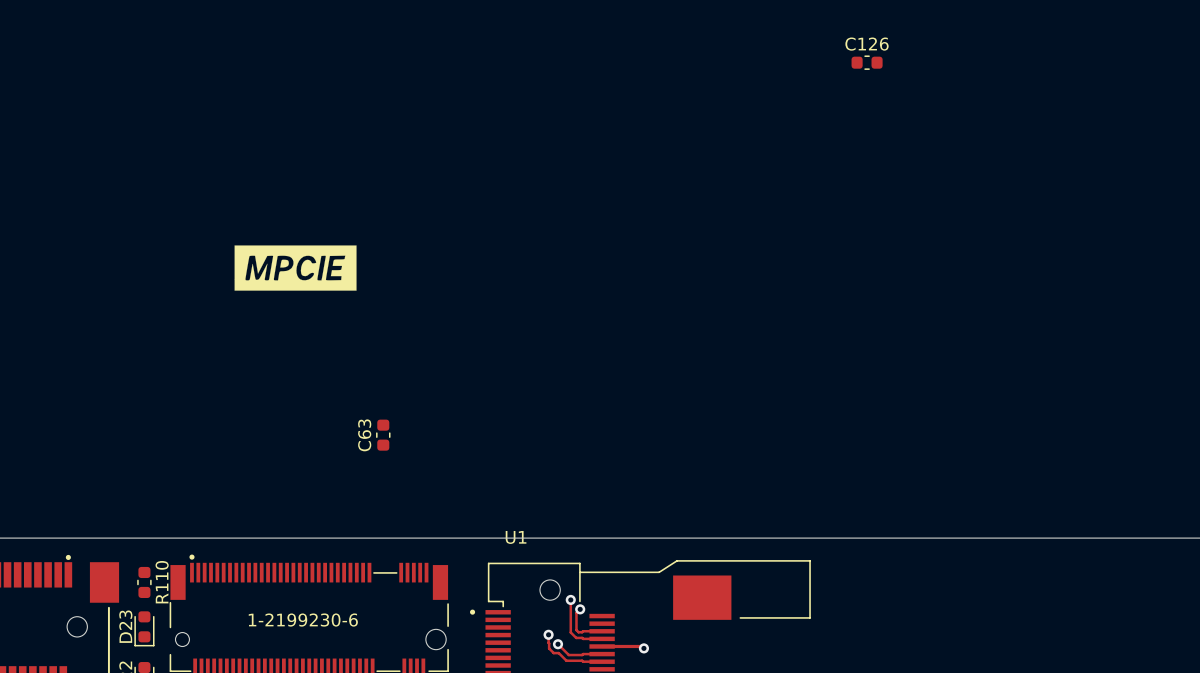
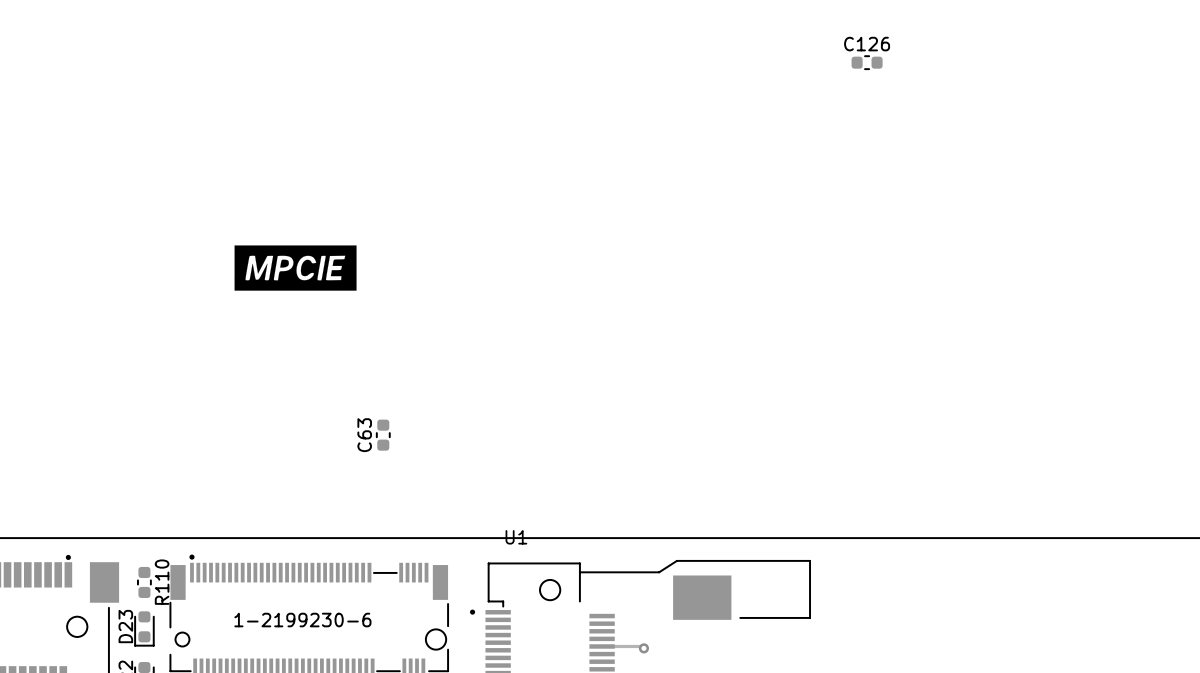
track: (570, 599) (570, 632) (576, 637) (602, 638) -> none
via: (570, 599) -> none
track: (580, 609) (576, 613) (576, 630) (578, 632) (602, 631) -> none
via: (580, 609) -> none
track: (548, 634) (549, 648) (553, 653) (558, 653) (566, 660) (602, 661) -> none
via: (548, 634) -> none
track: (558, 644) (568, 655) (602, 654) -> none
via: (558, 644) -> none

